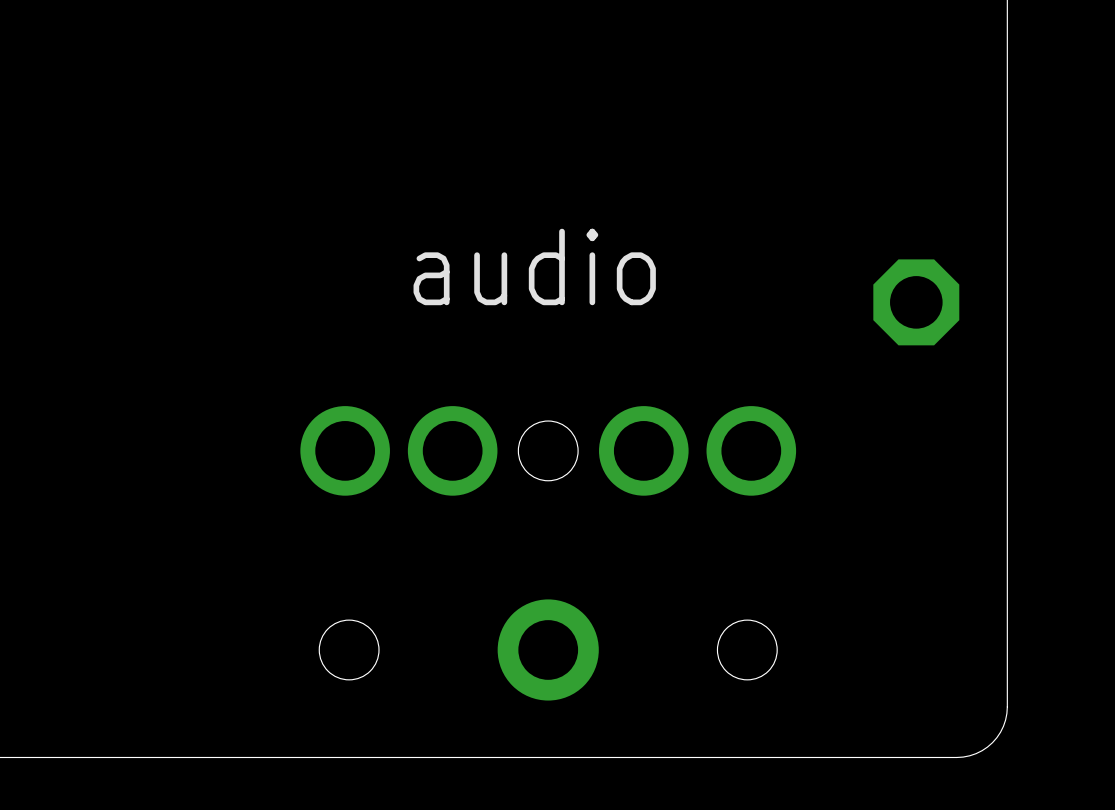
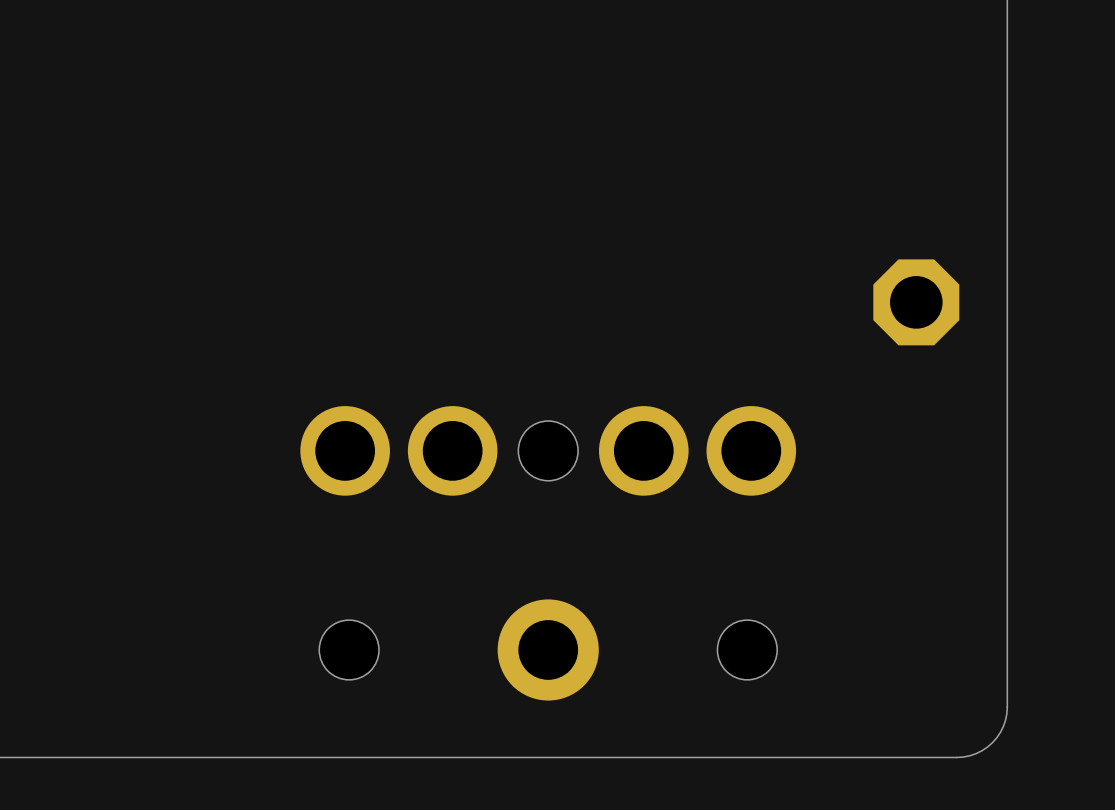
text: audio (534, 266) -> none

